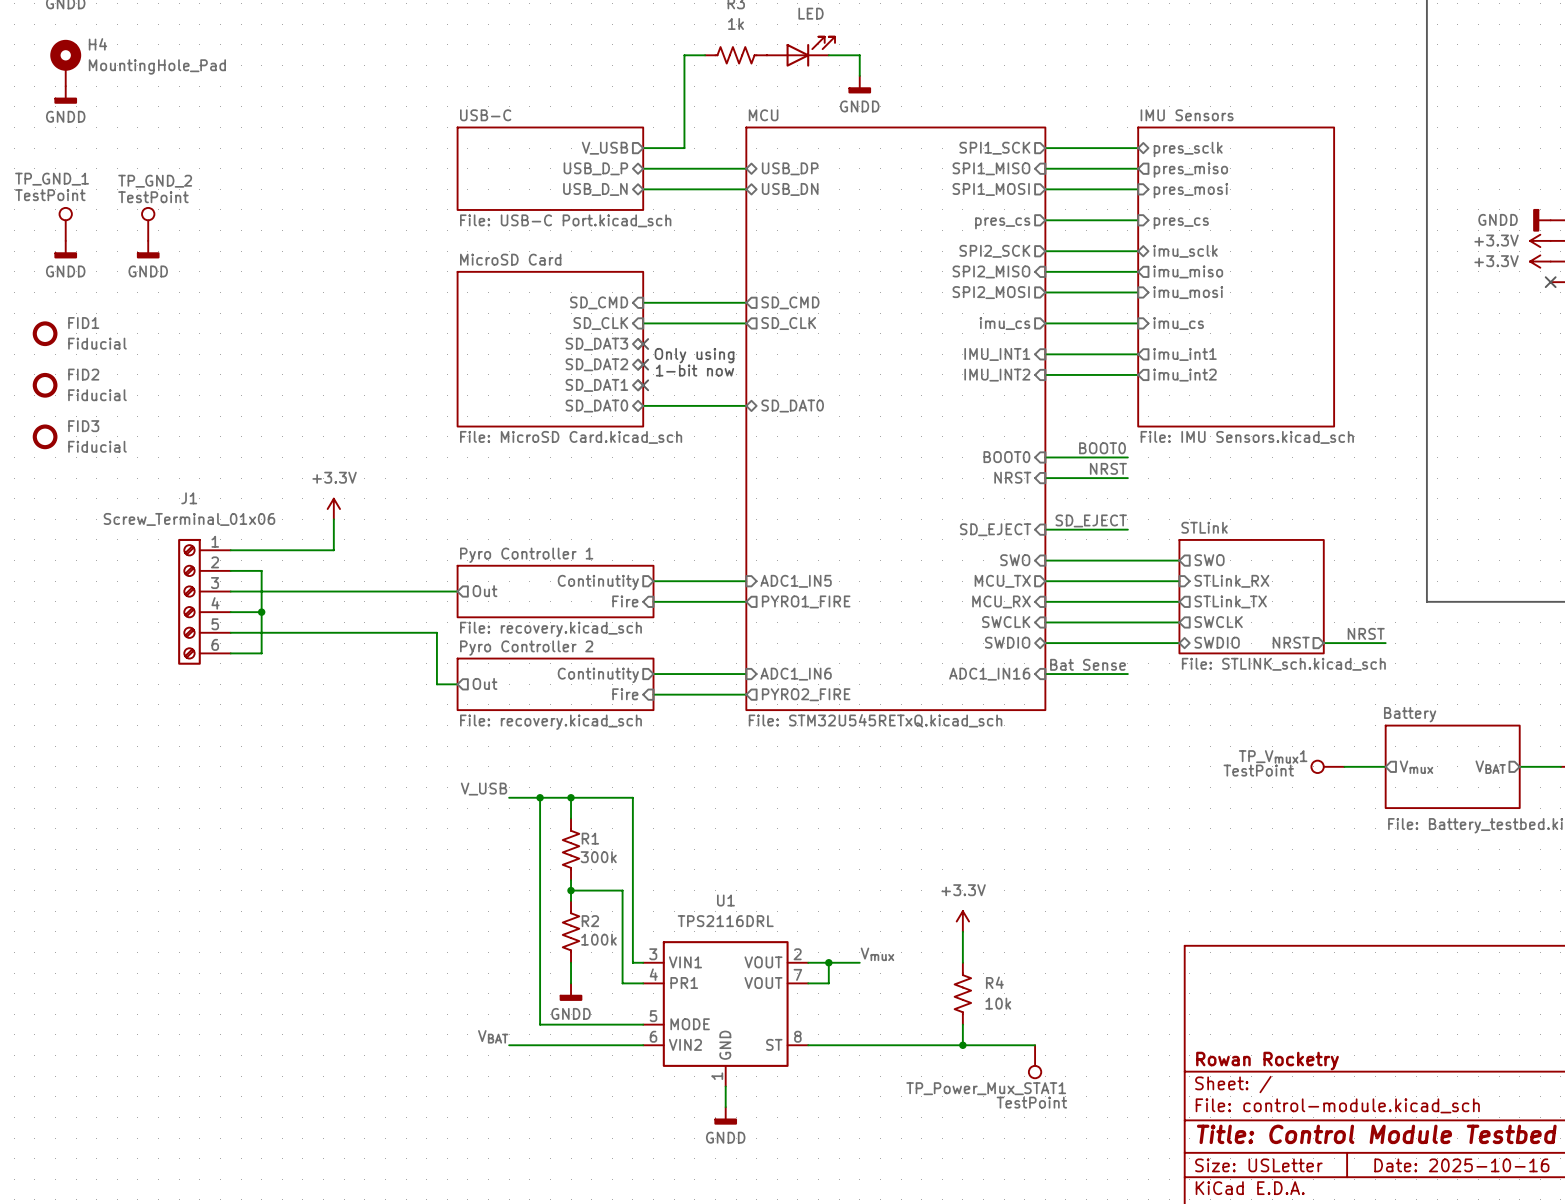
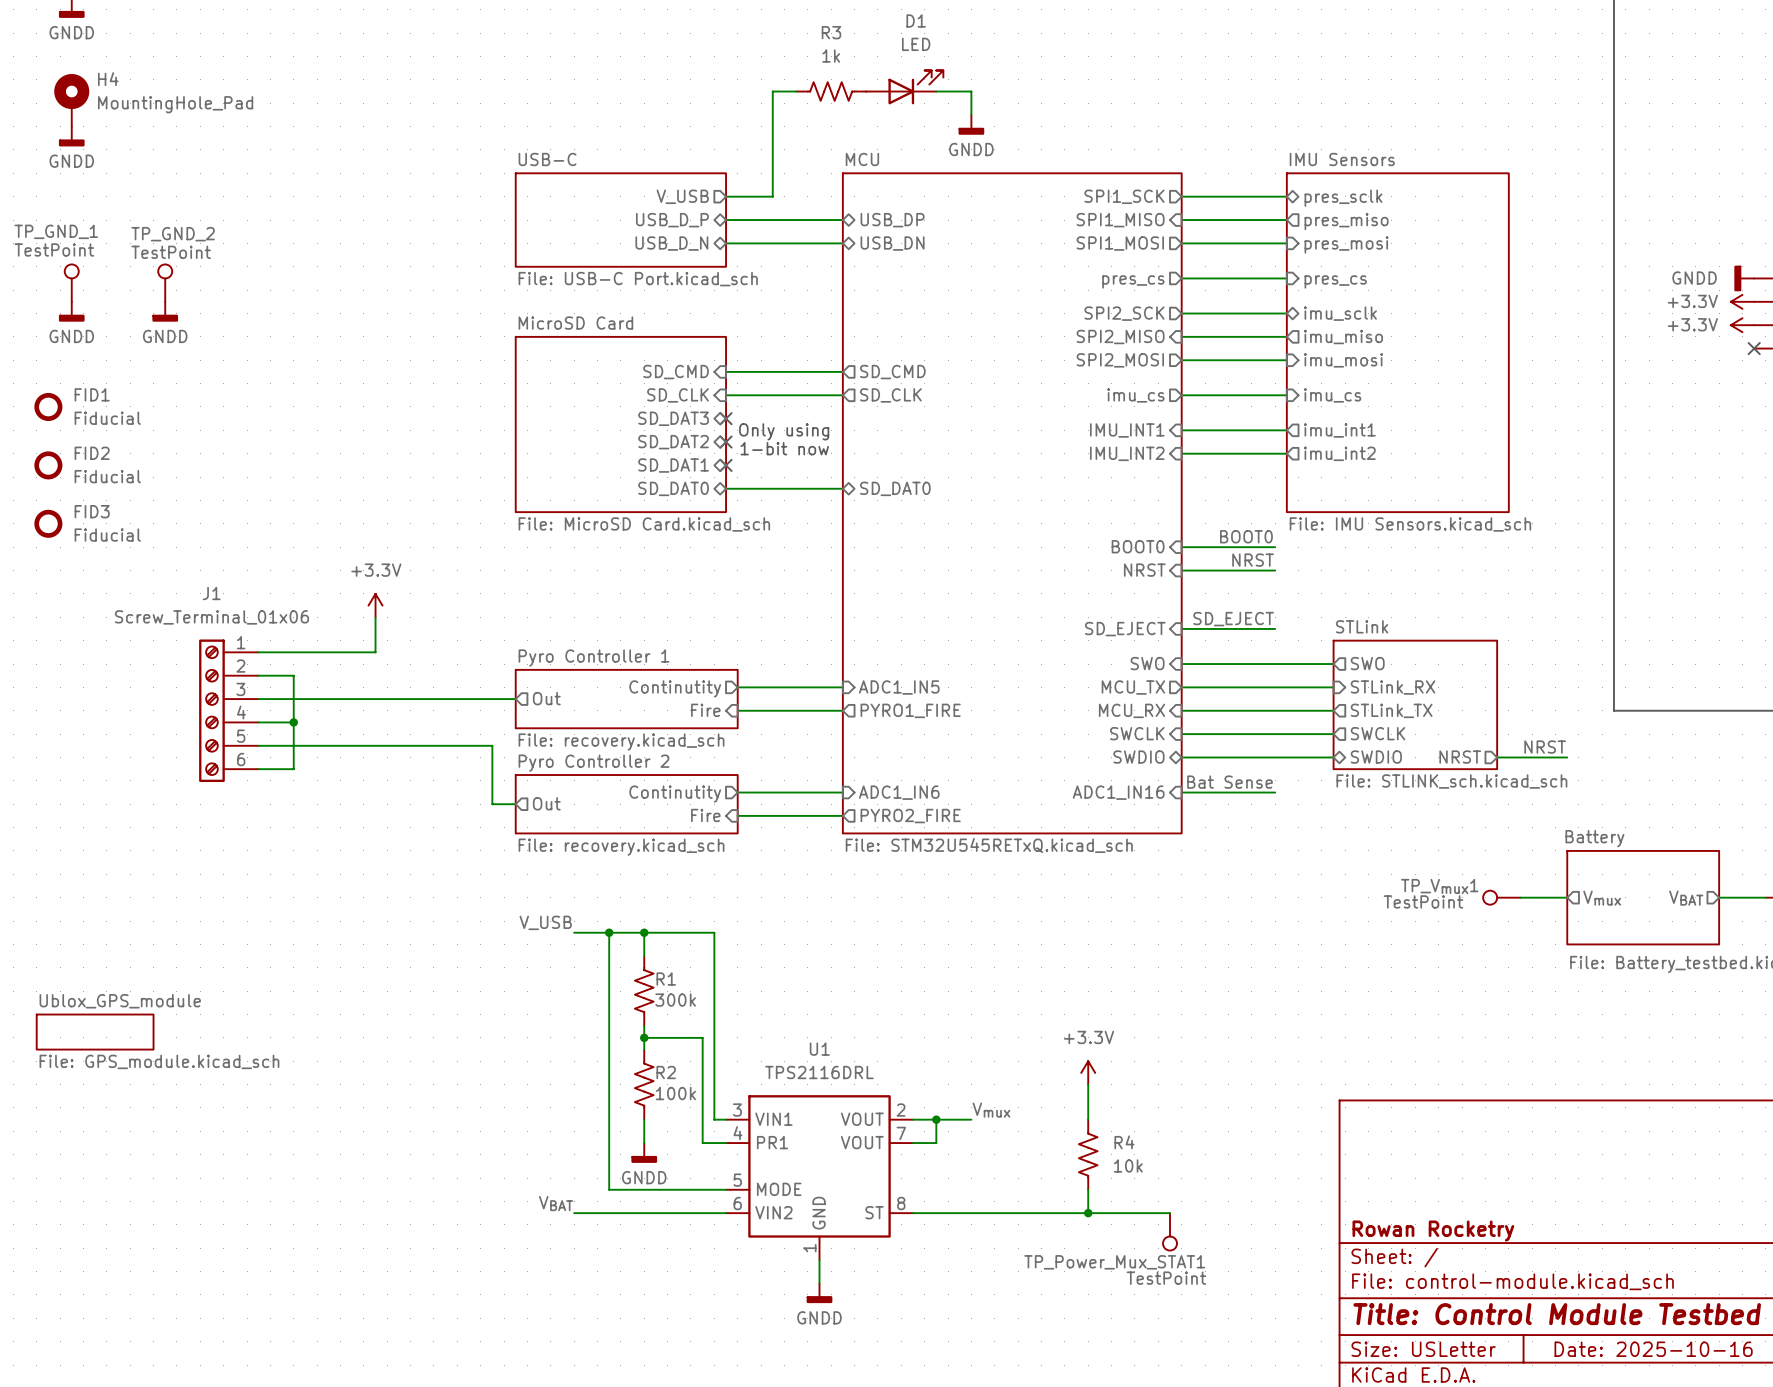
sheet Ublox_GPS_module: none -> File: GPS_module.kicad_sch (95, 1032)

